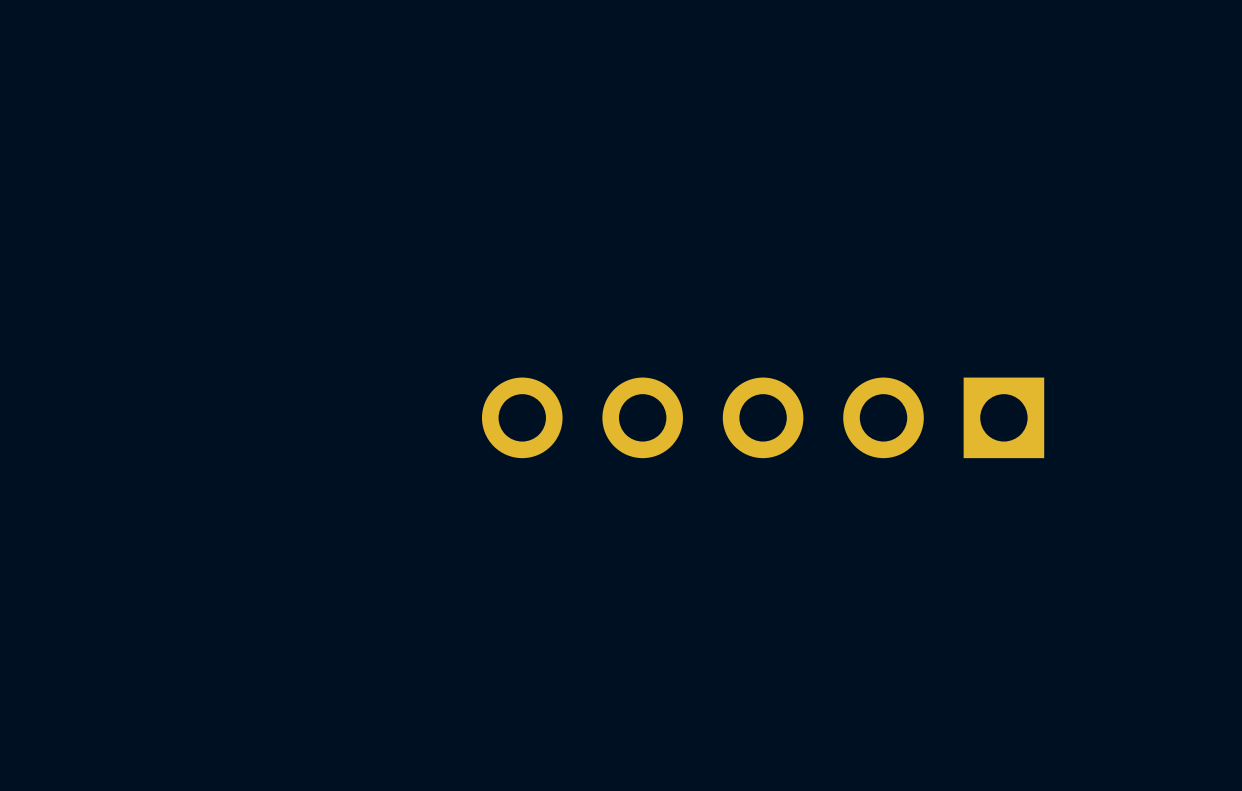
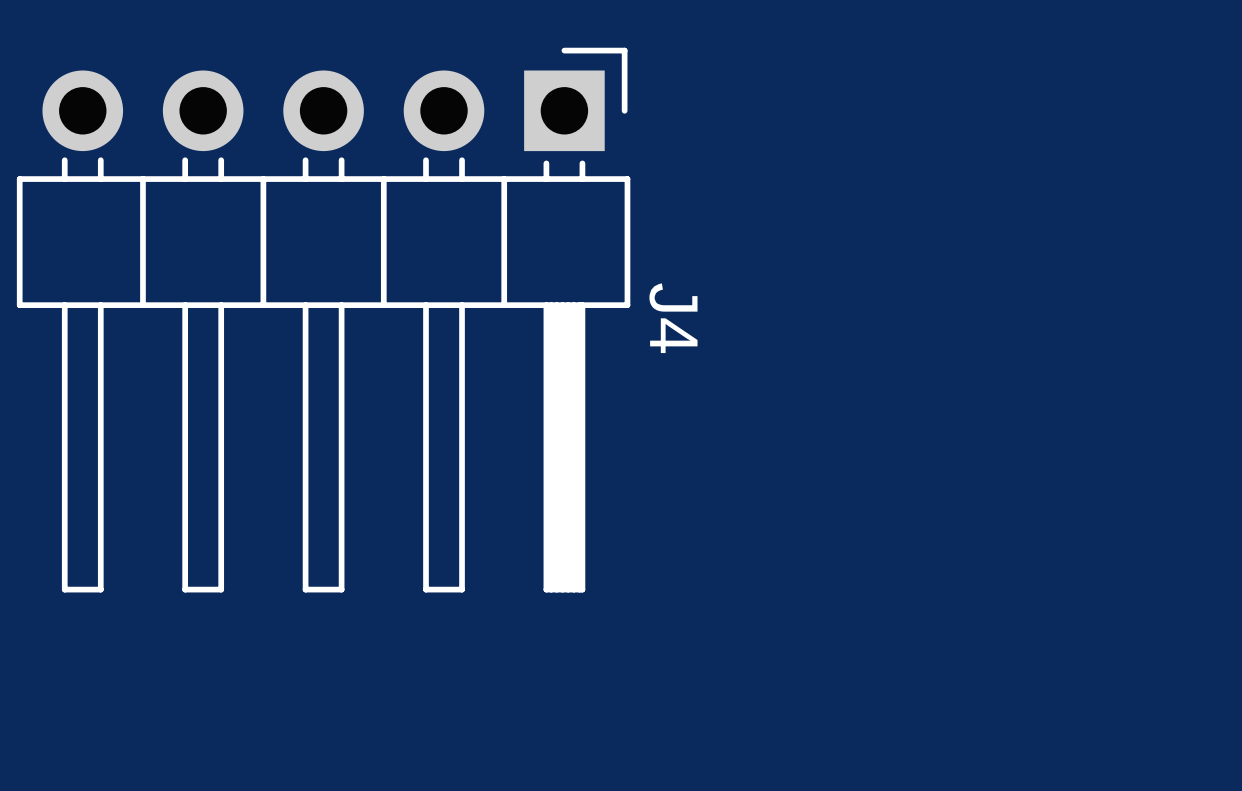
J4 side: top (763, 417) -> bottom (323, 320)

